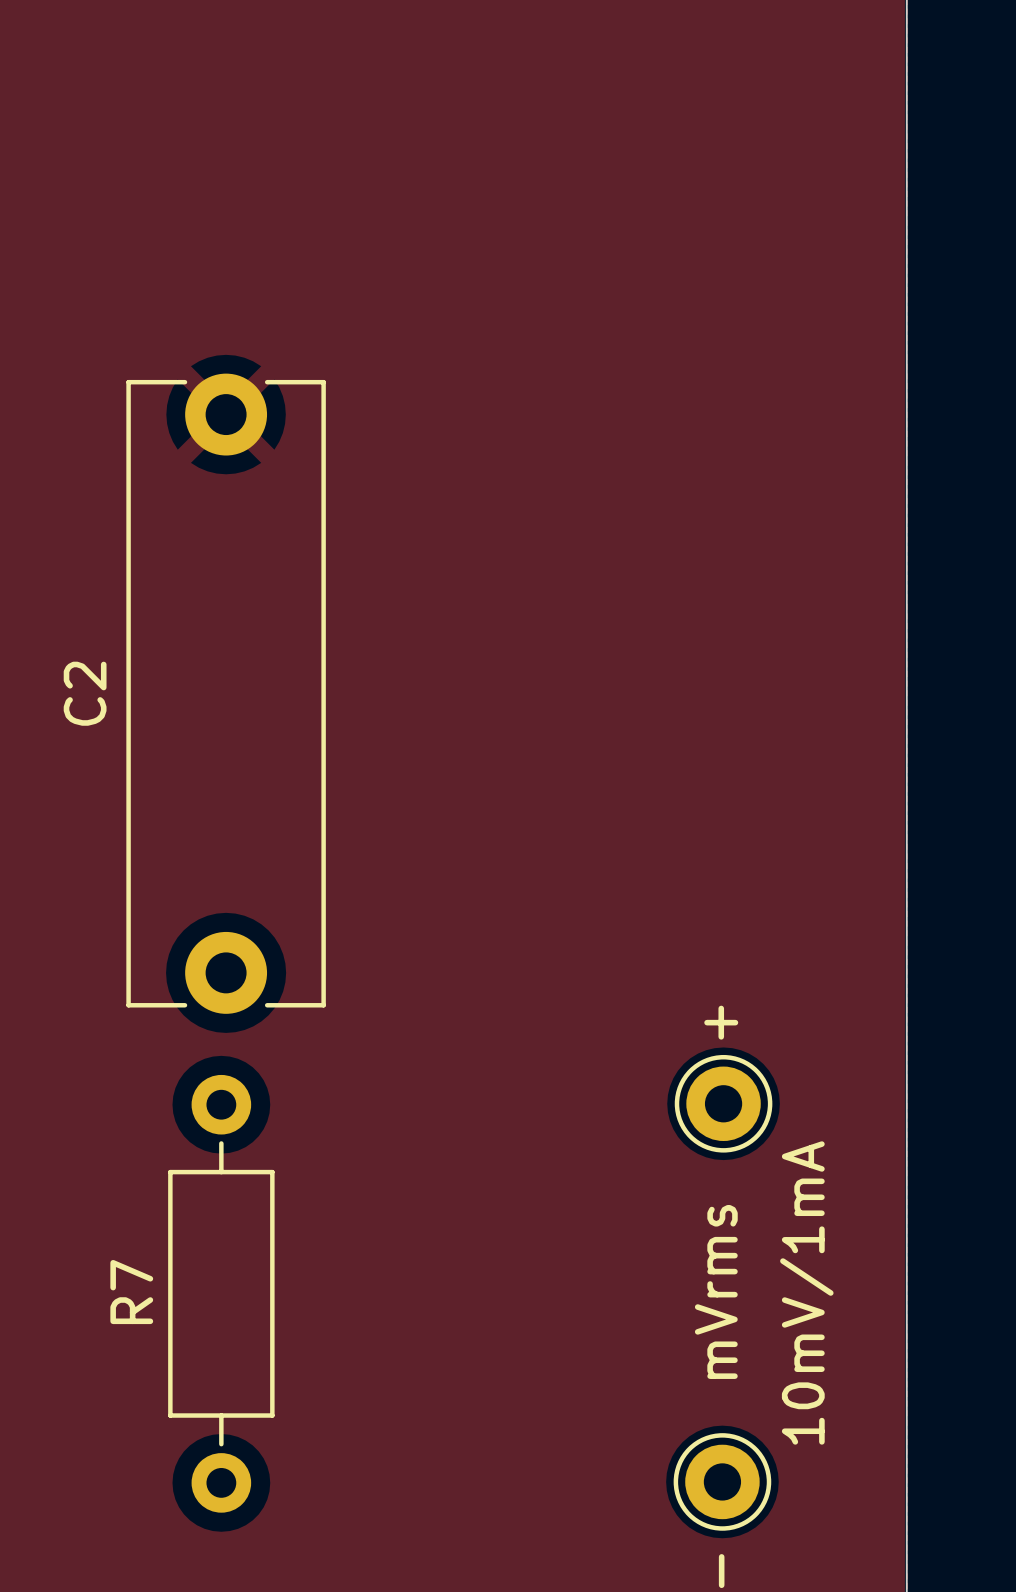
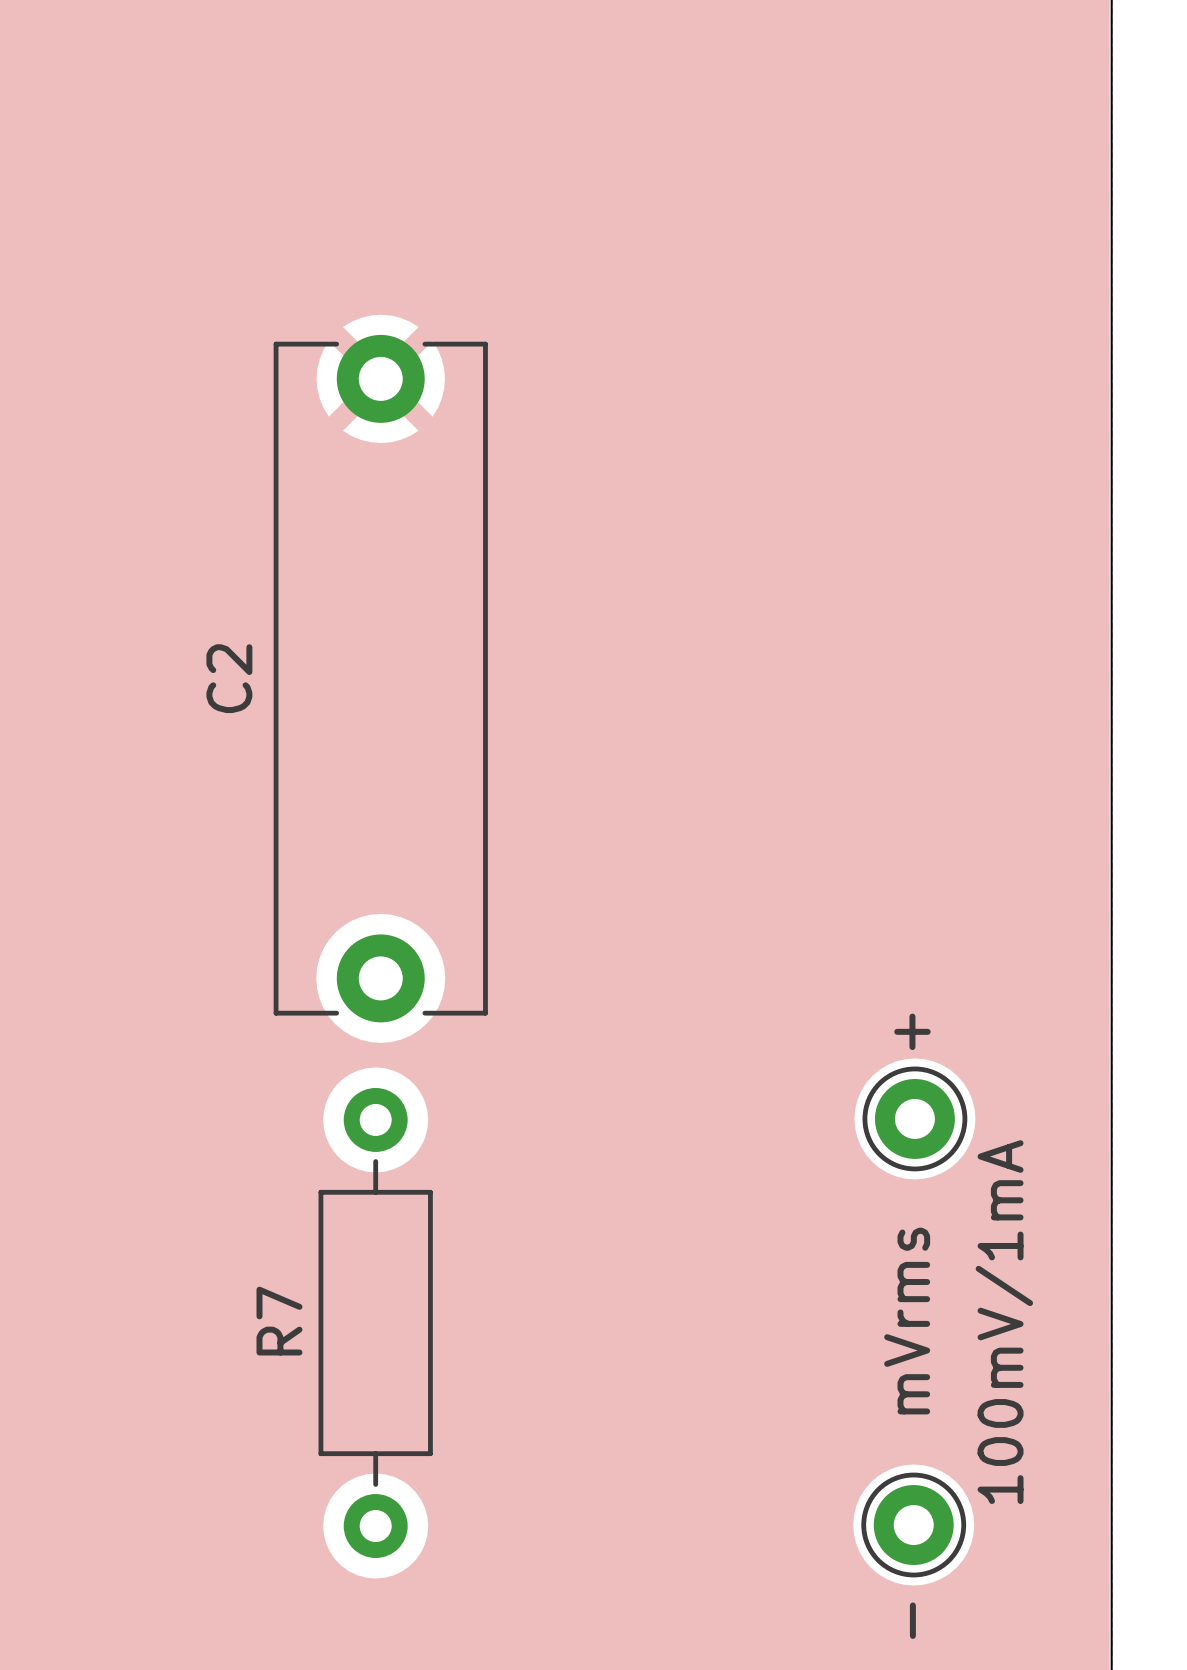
text: 10mV/1mA (806, 1292) -> 100mV/1mA (1004, 1322)

